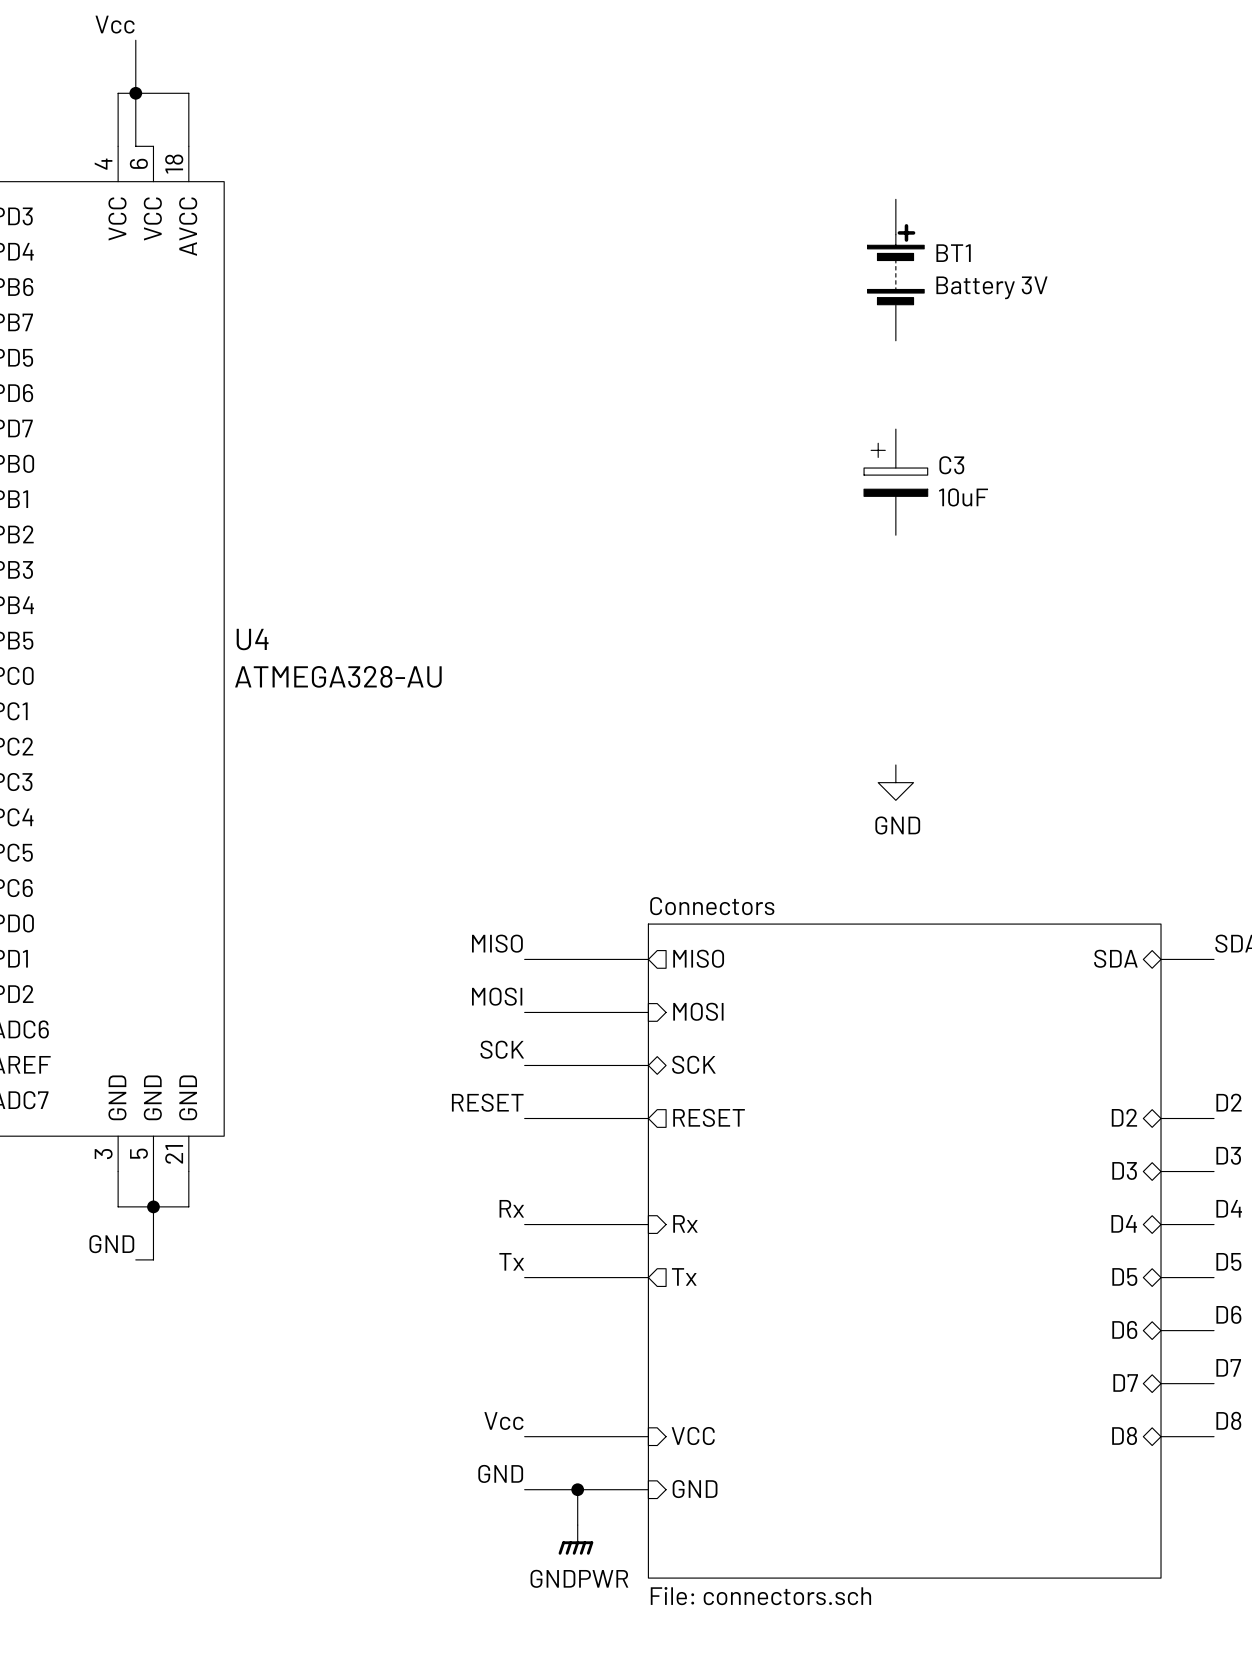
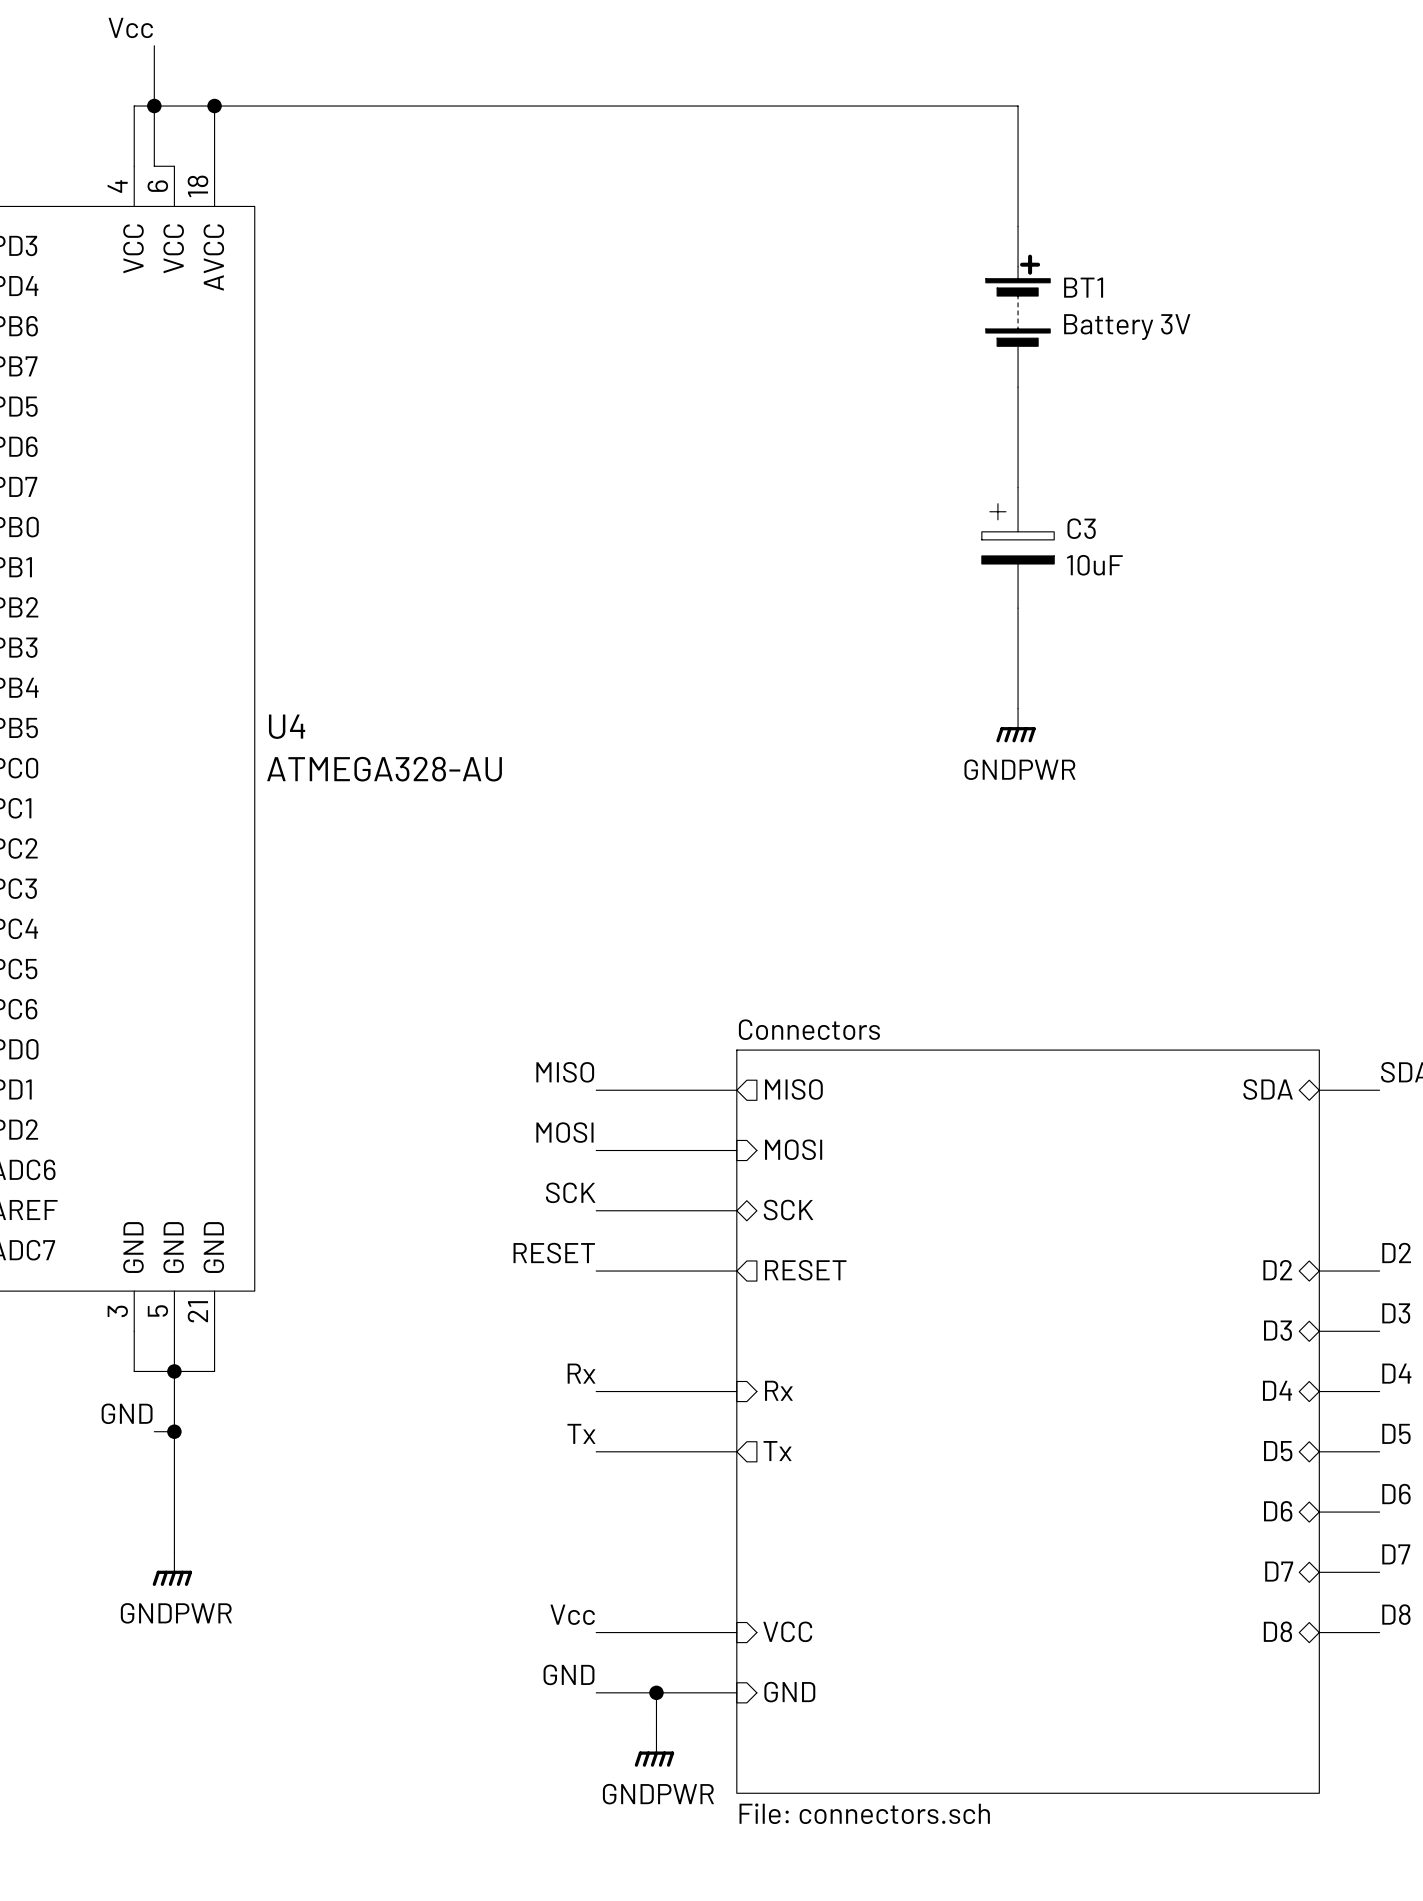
wire: none -> (214, 106) (1018, 106) (1018, 226)
junction: none -> (214, 106)
wire: none -> (1018, 387) (1018, 487)
wire: none -> (1018, 608) (1018, 708)
power symbol: none -> GNDPWR (1016, 725)
power symbol: GND (895, 782) -> none
wire: none -> (174, 1431) (174, 1552)
junction: none -> (174, 1431)
power symbol: none -> GNDPWR (172, 1569)

